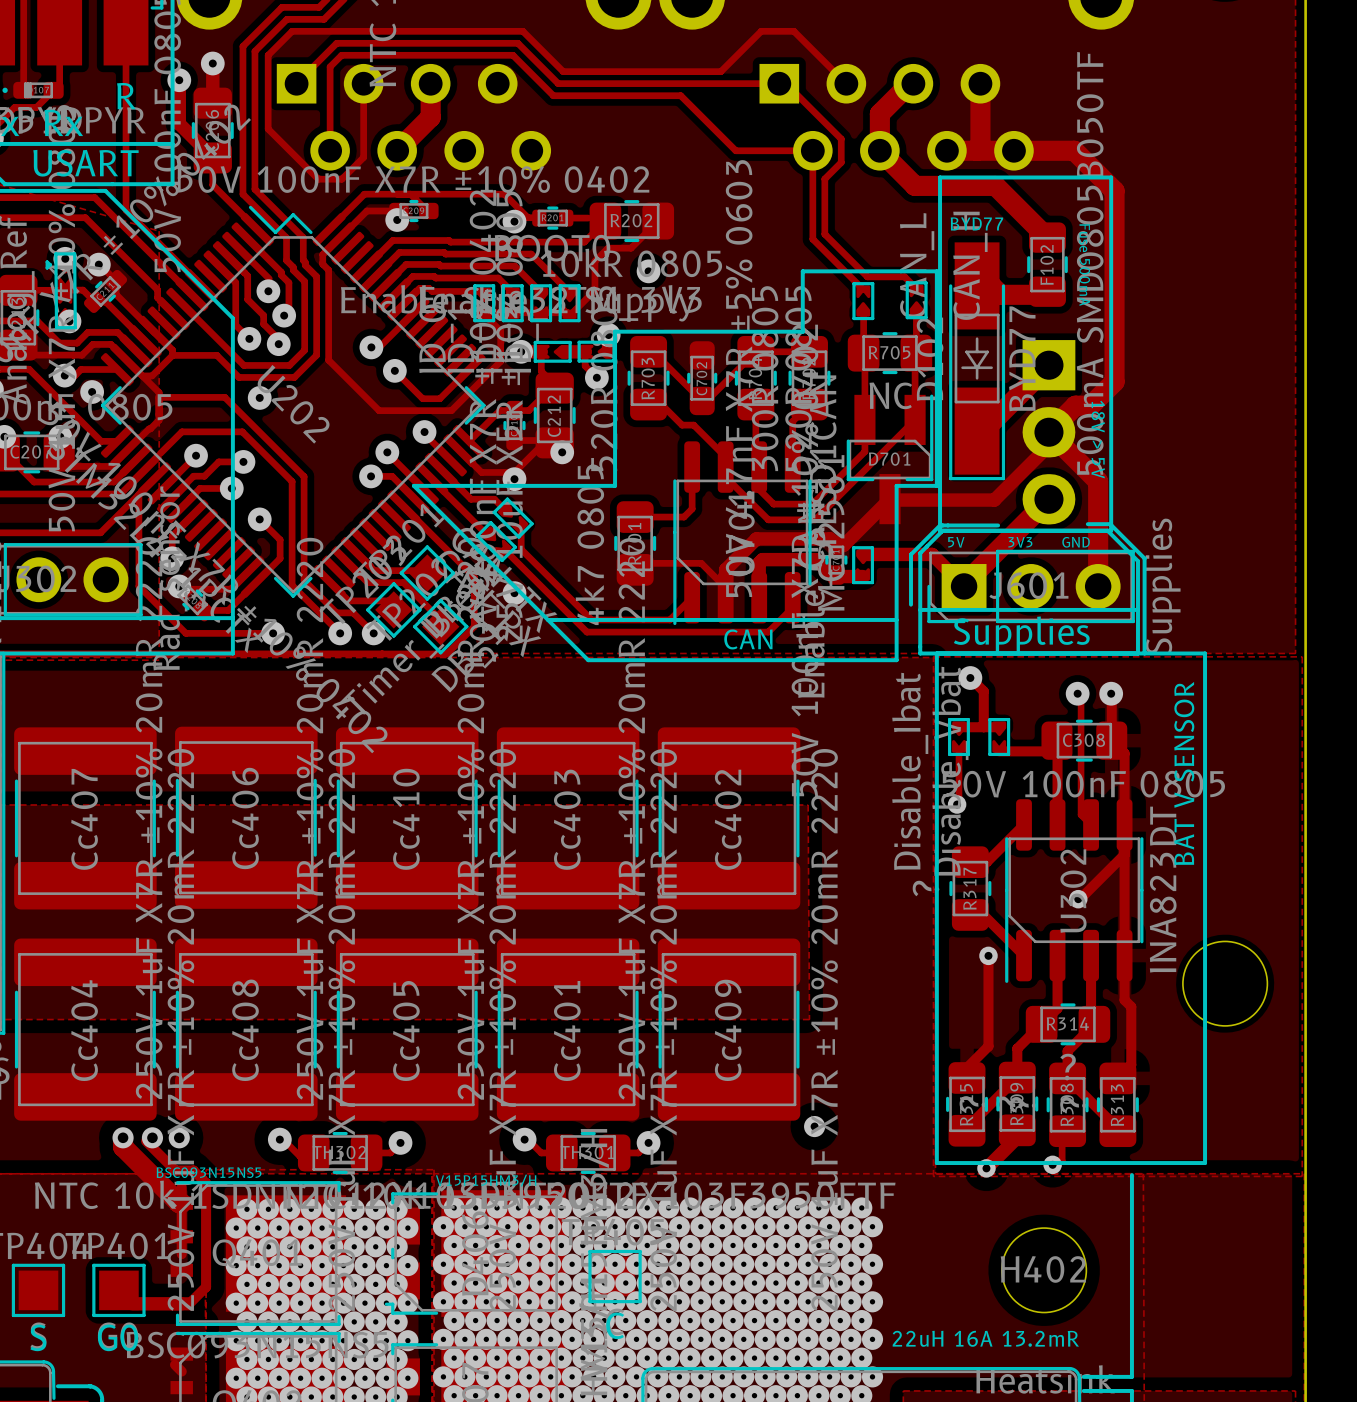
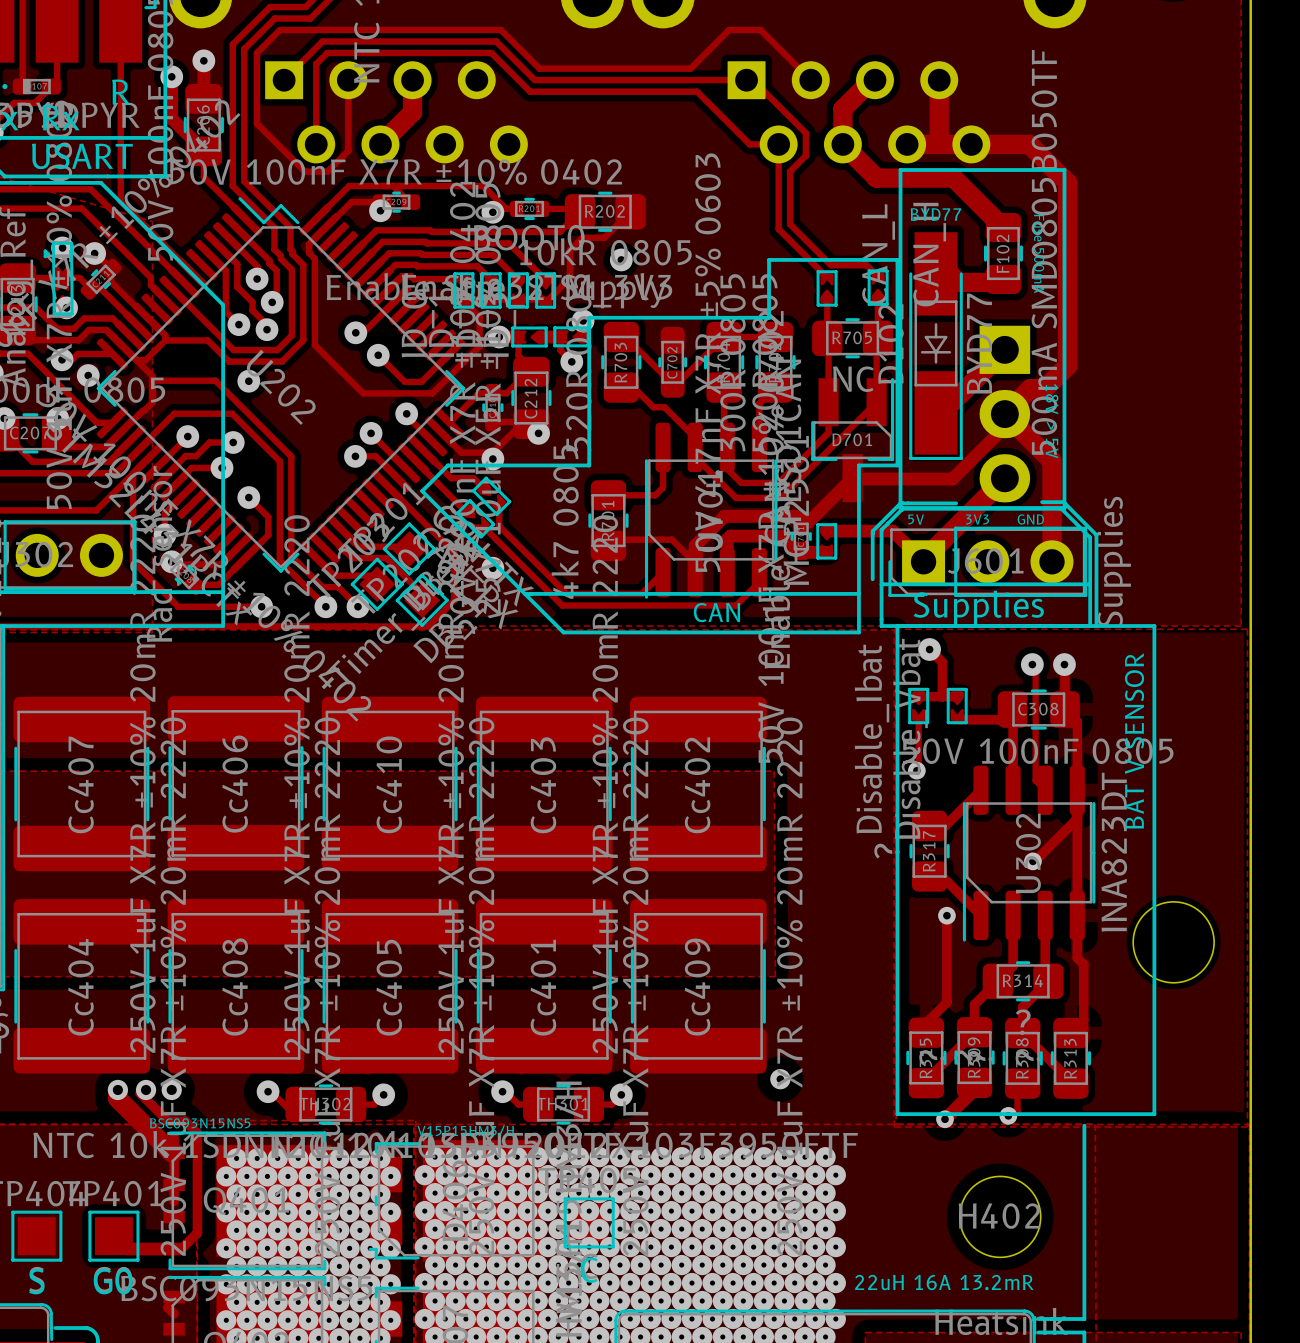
track: (680, 95) (735, 150) (782, 150) -> (652, 91) (697, 91) (749, 144)
line: (467, 485) (413, 485) (440, 512) -> (447, 465) (422, 491)

